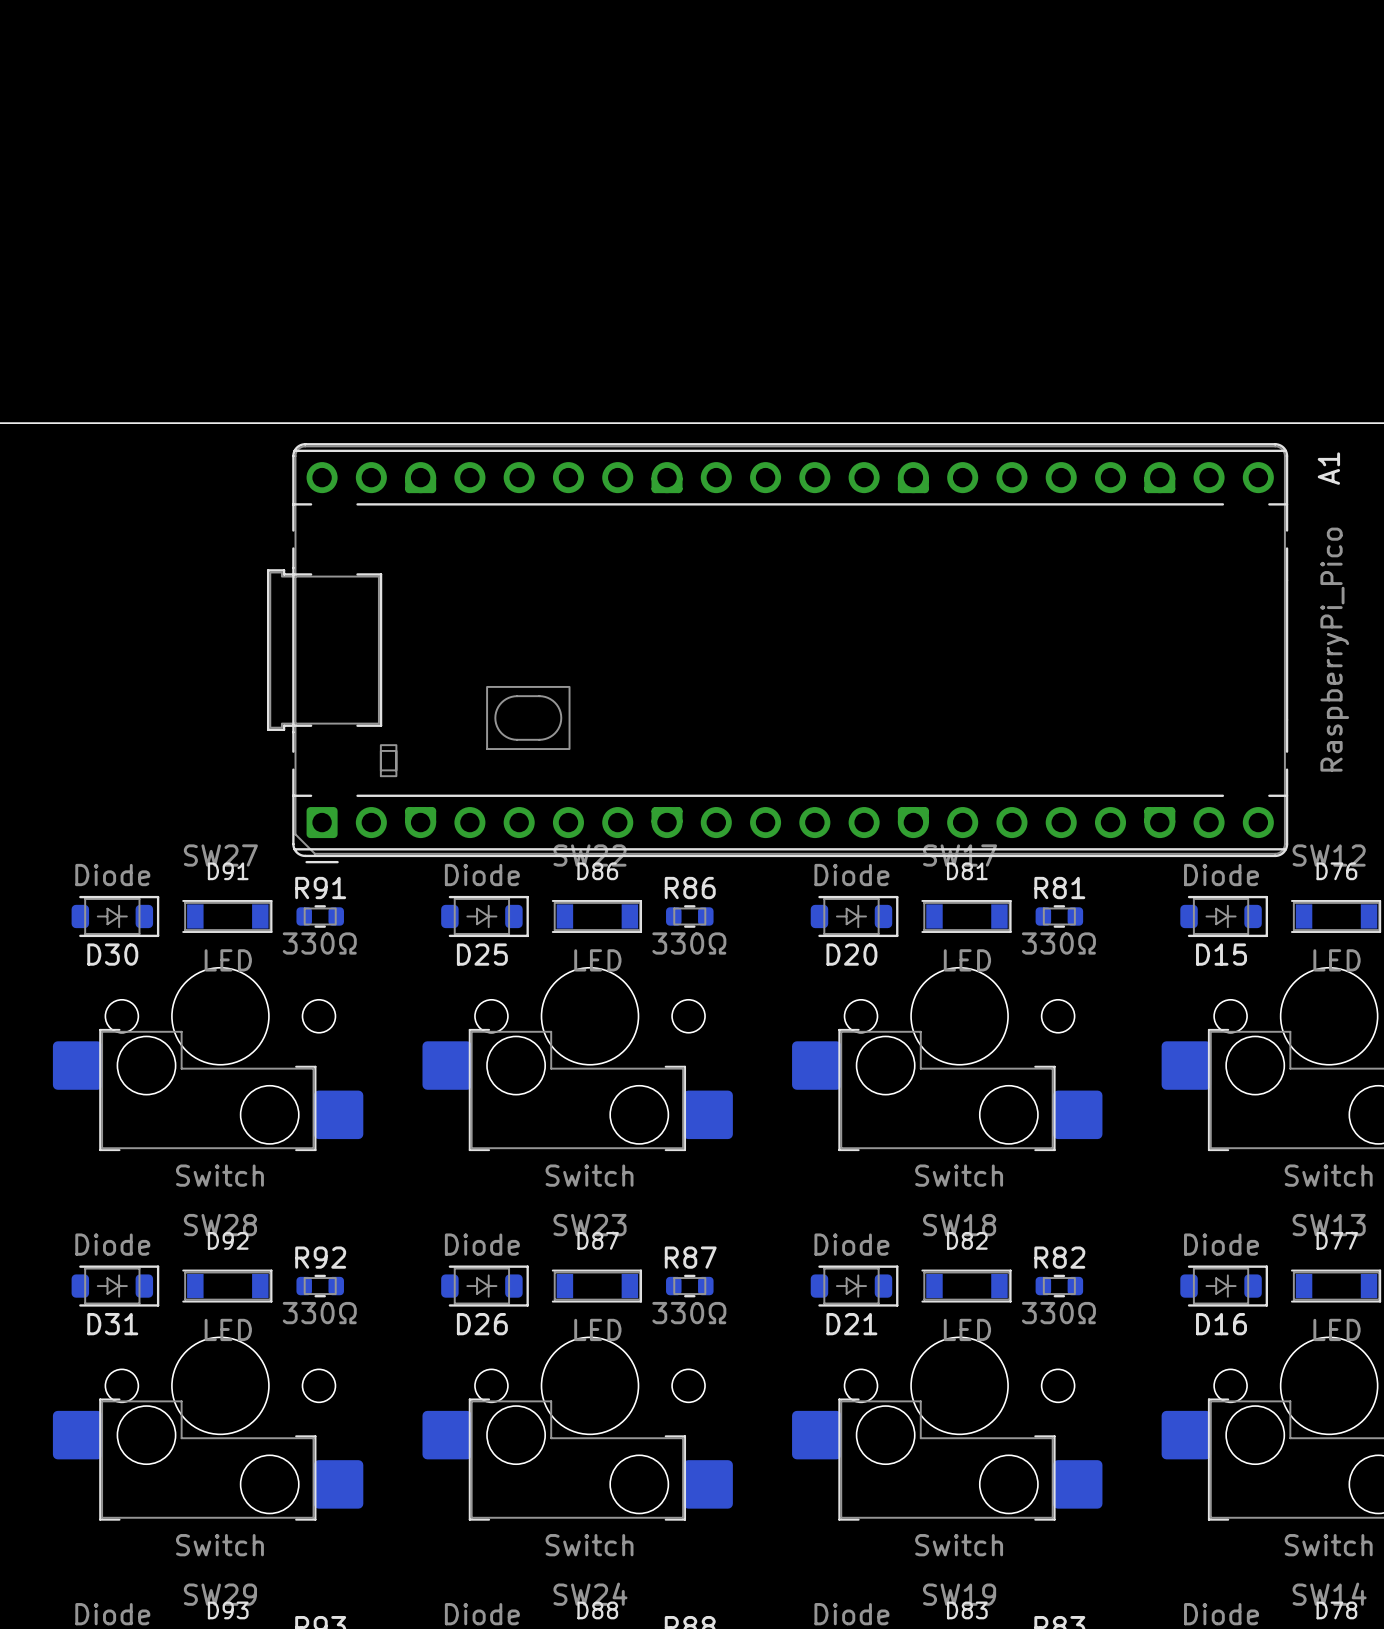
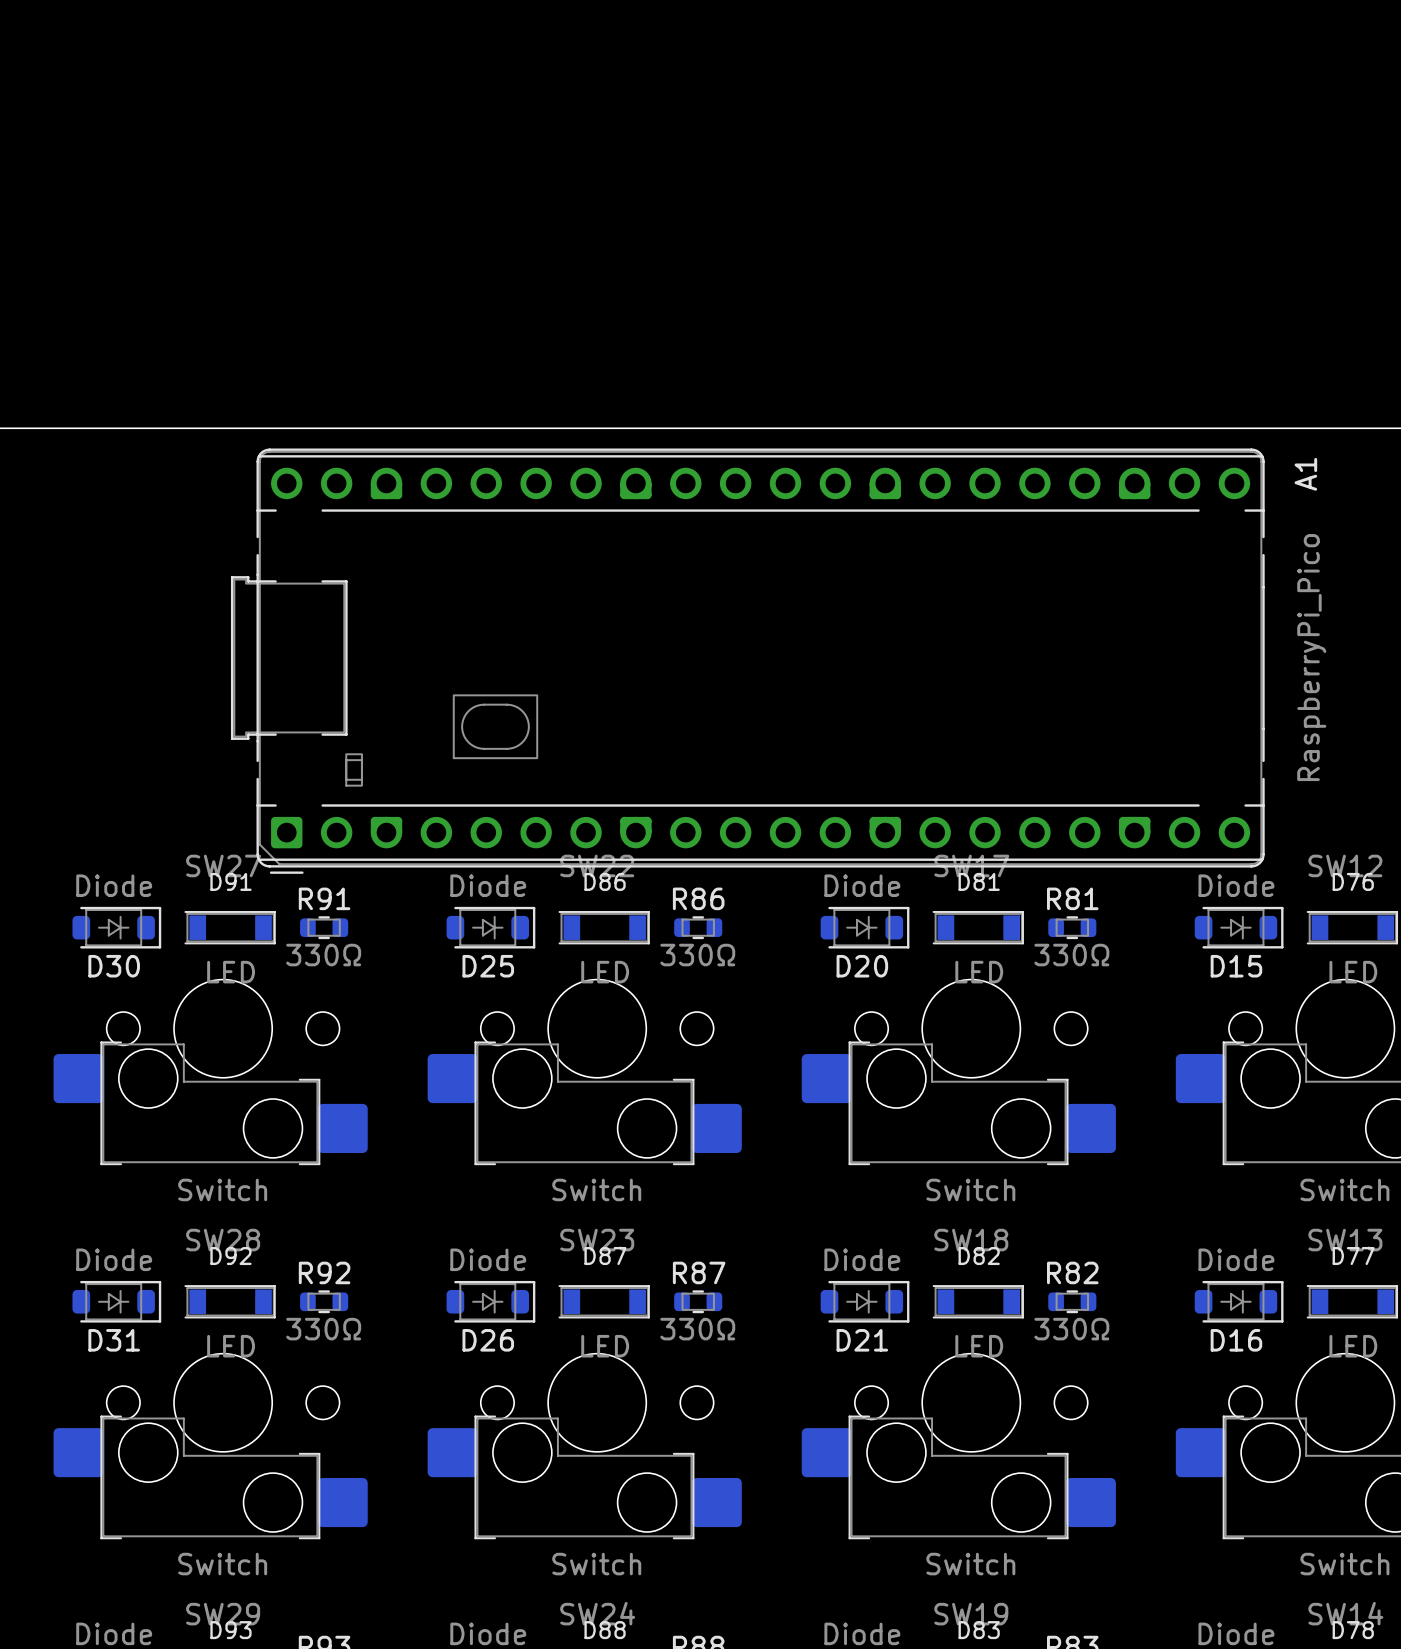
A1 position: (777, 653) -> (747, 661)

